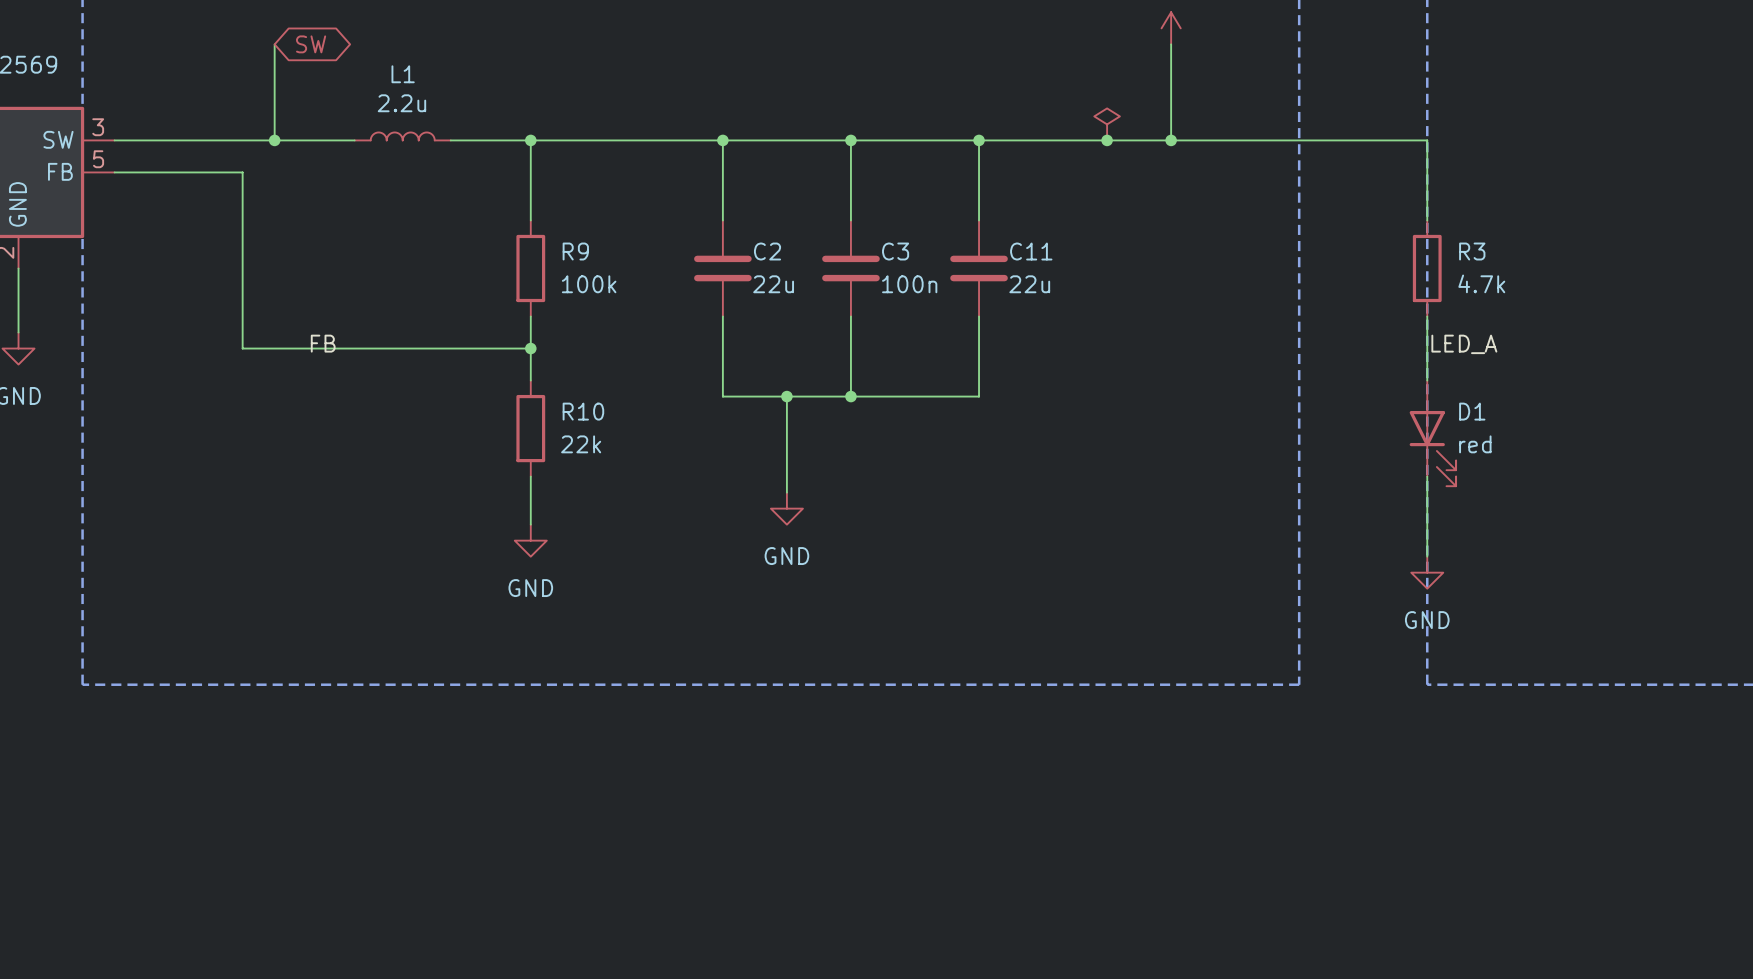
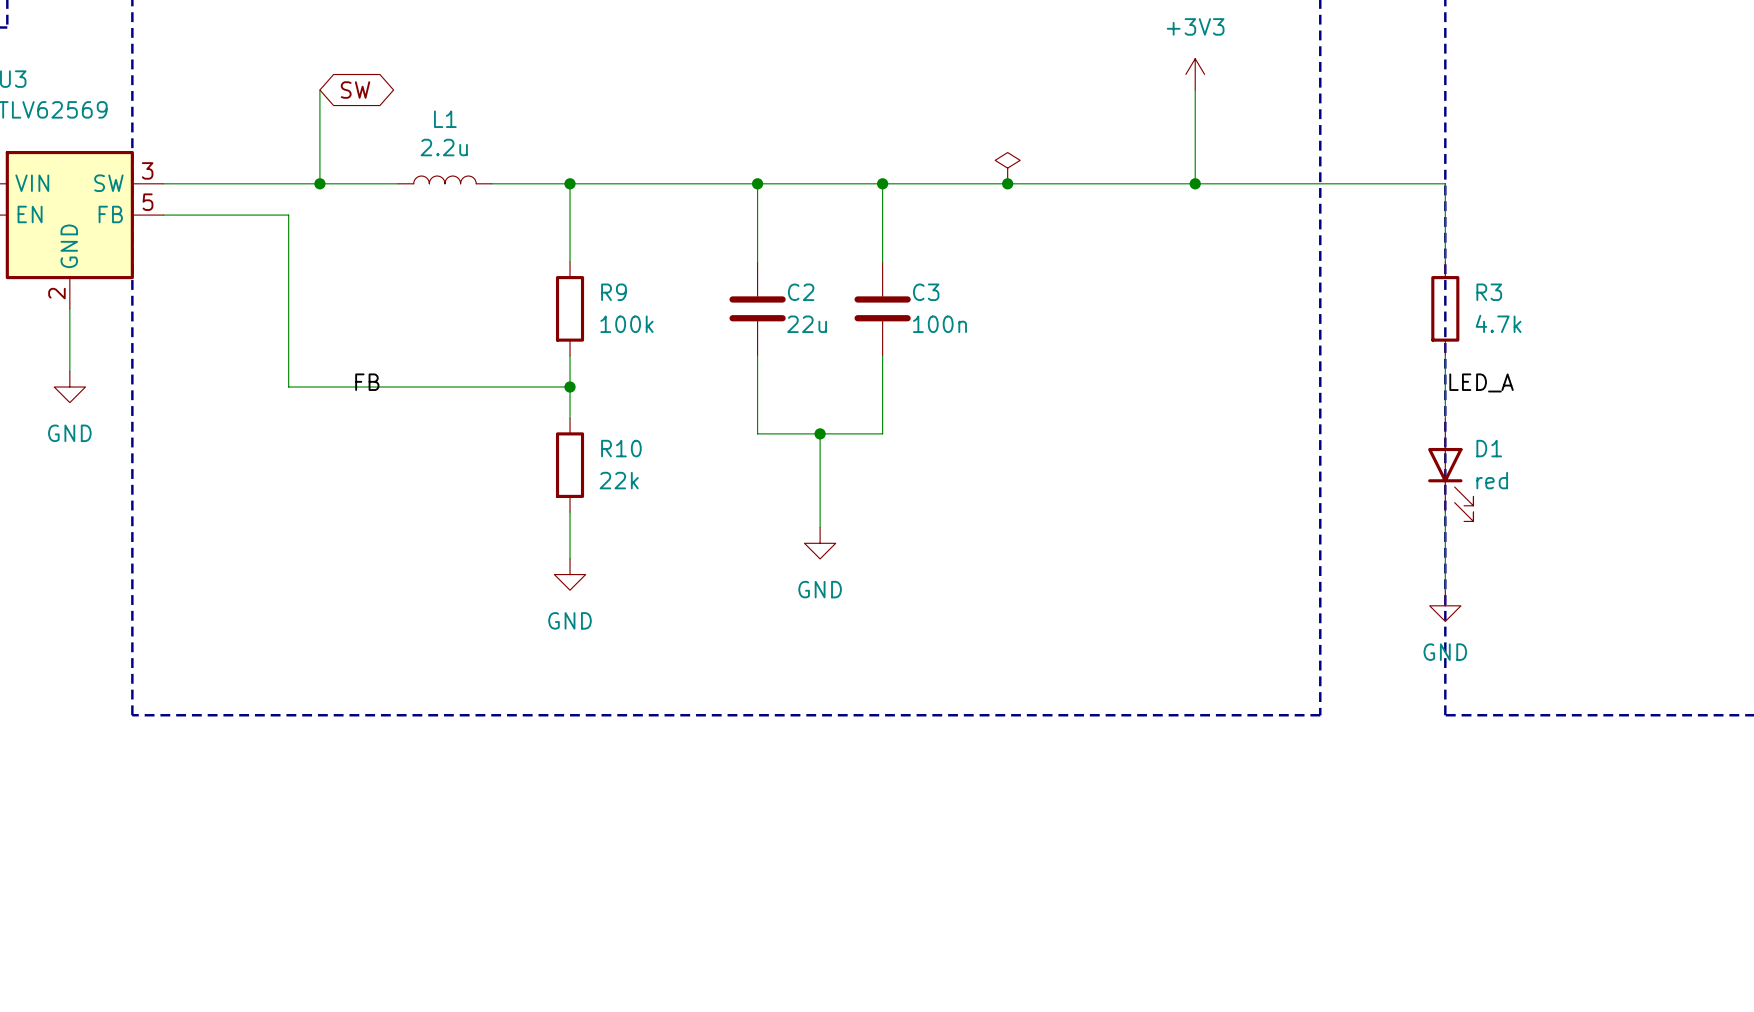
power symbol position: (1107, 124) -> (1007, 168)
wire: (979, 140) (979, 220) -> none
junction: (1107, 140) -> none
C11: 22u (979, 268) -> none
wire: (979, 316) (979, 396) (850, 396) -> none
junction: (850, 396) -> none

